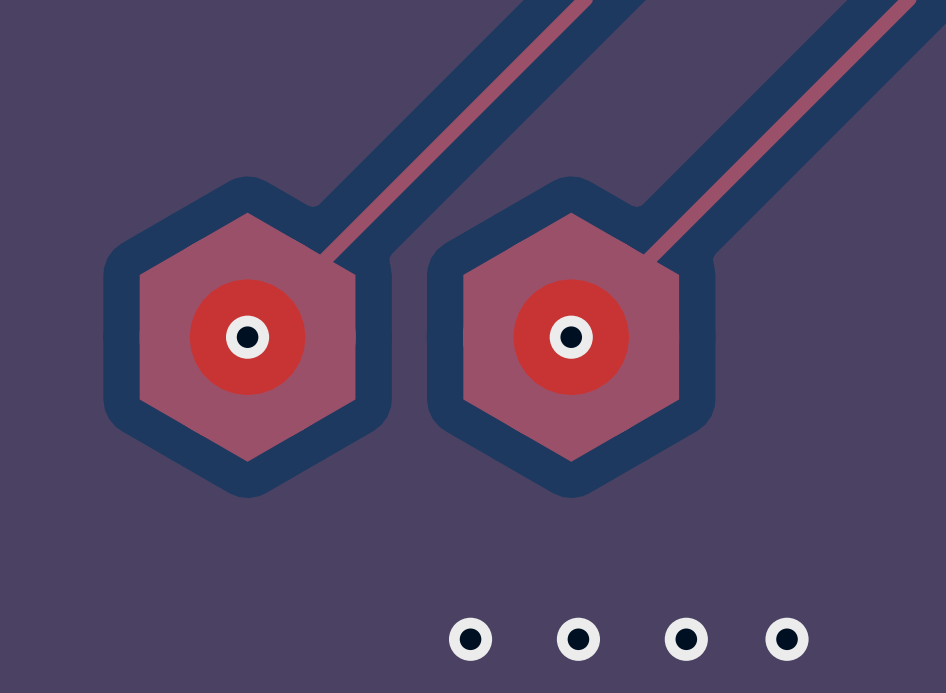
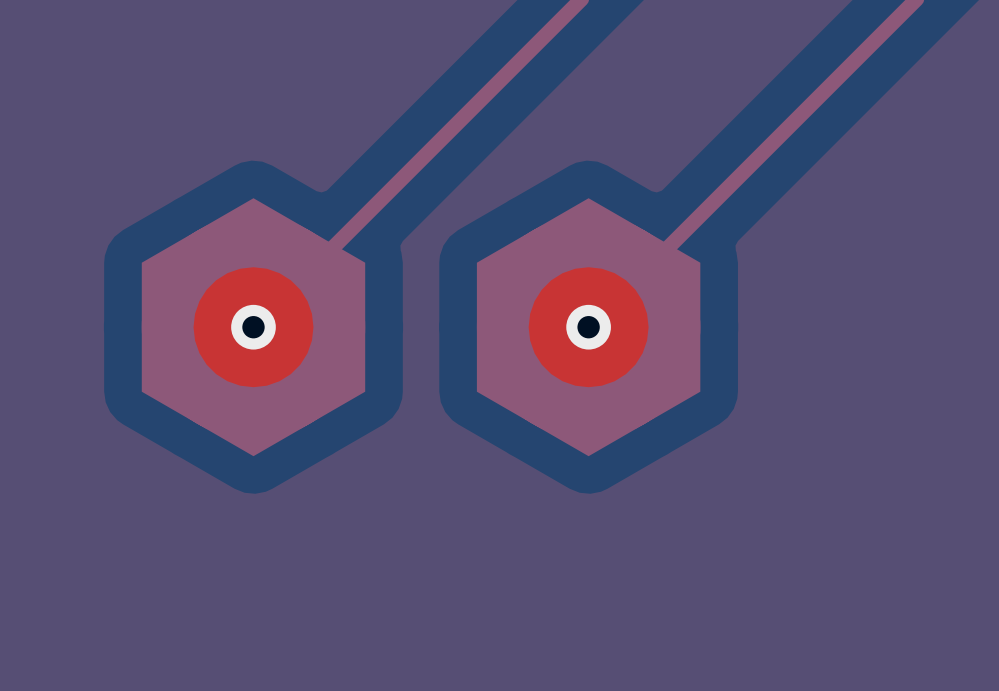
via: (470, 639) -> none
via: (578, 639) -> none
via: (686, 639) -> none
via: (787, 639) -> none

